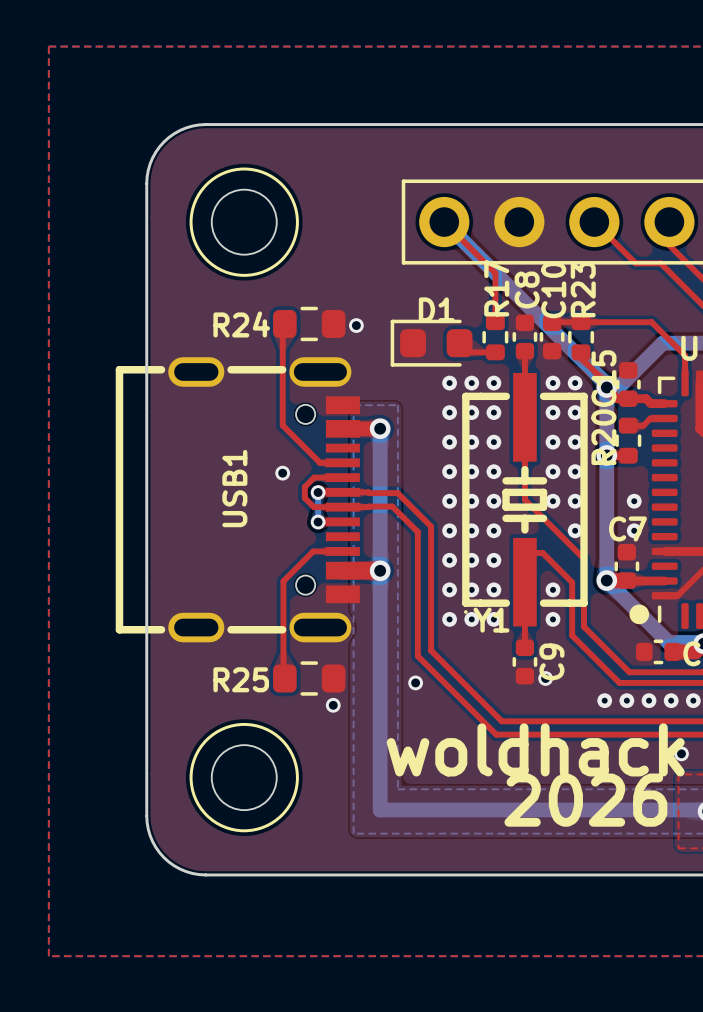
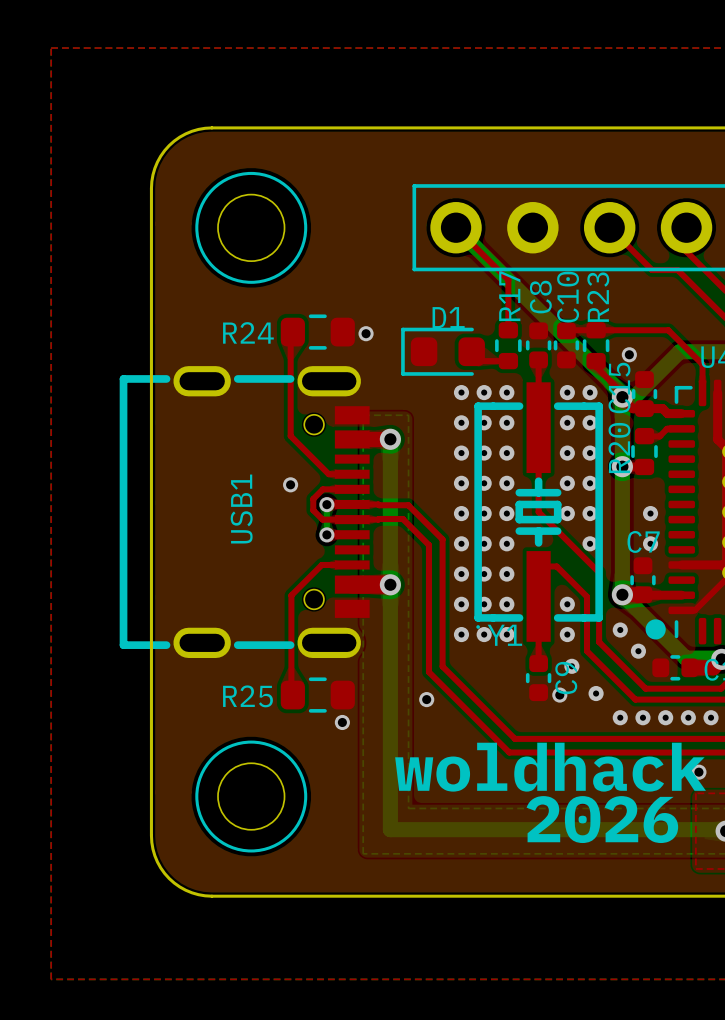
via: none -> (629, 354)
via: none -> (620, 630)
via: none -> (638, 651)
via: none -> (571, 666)
via: none -> (596, 693)

